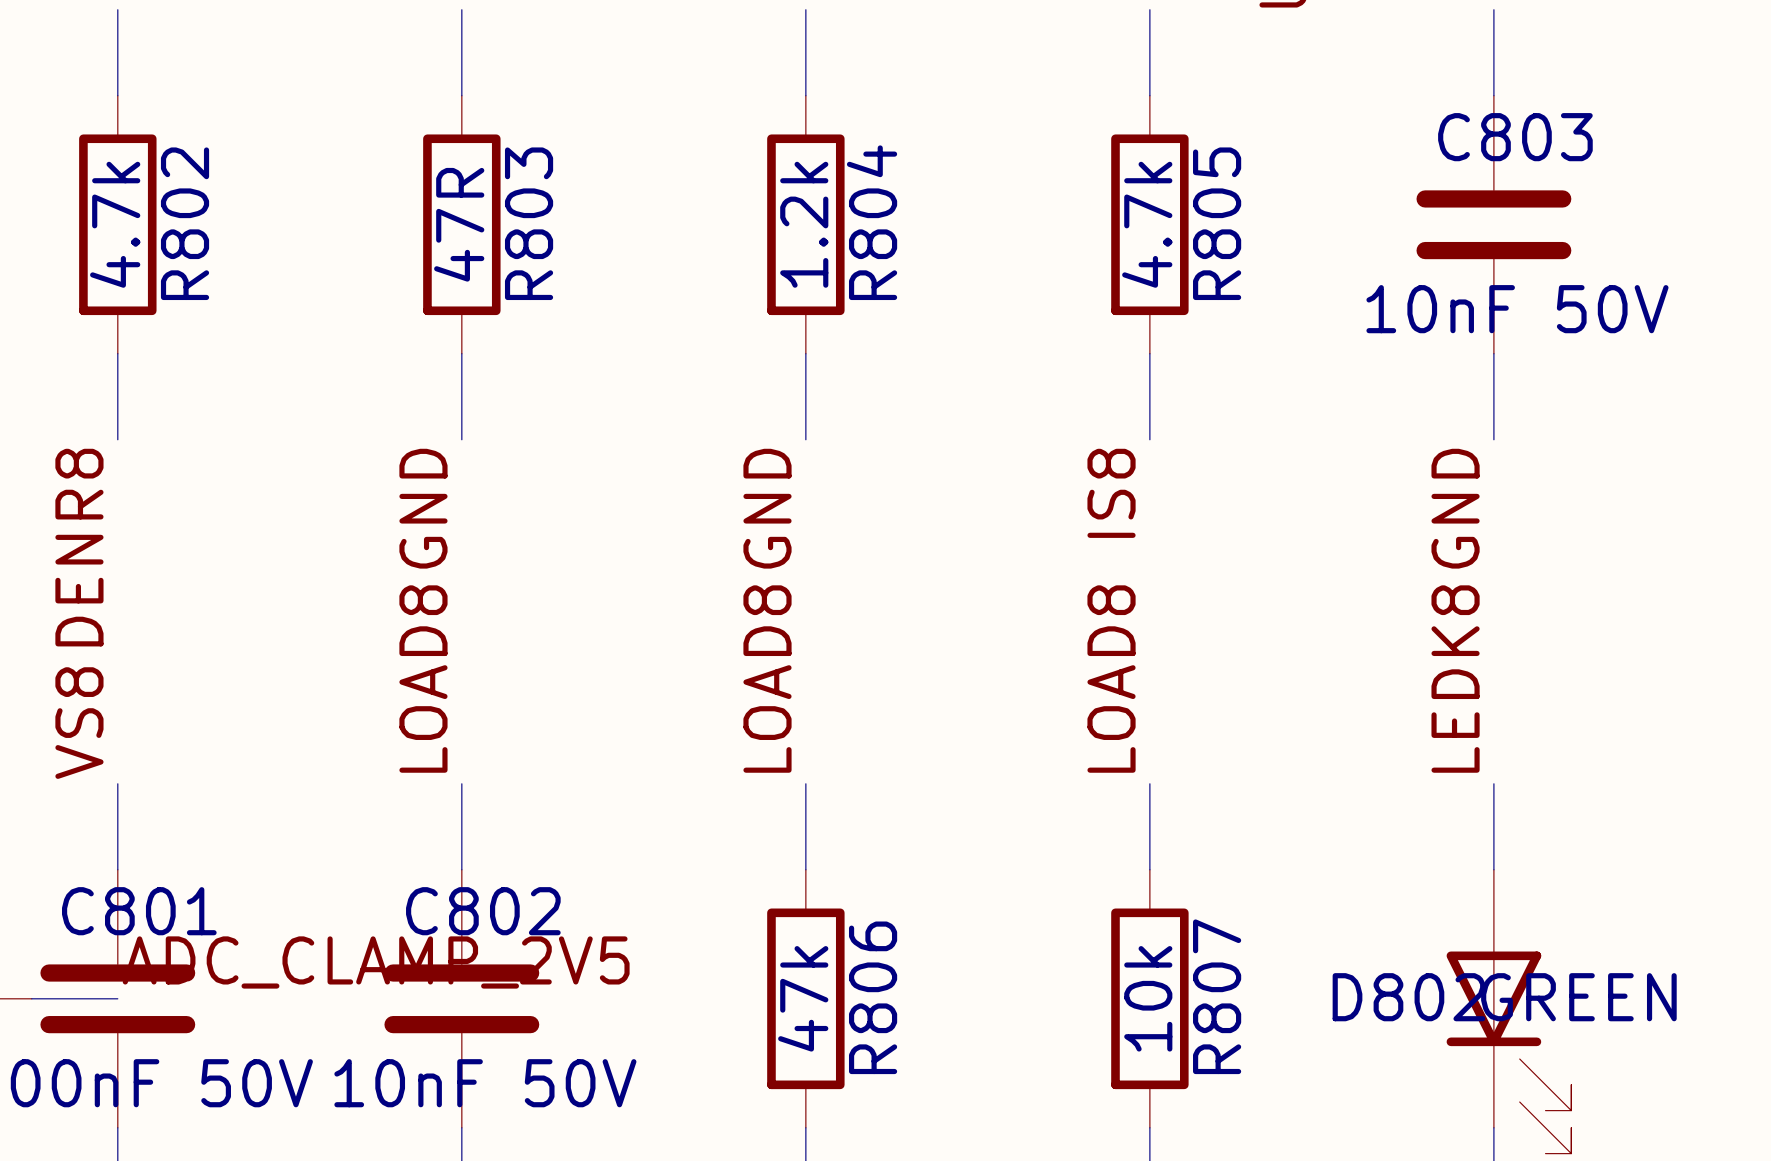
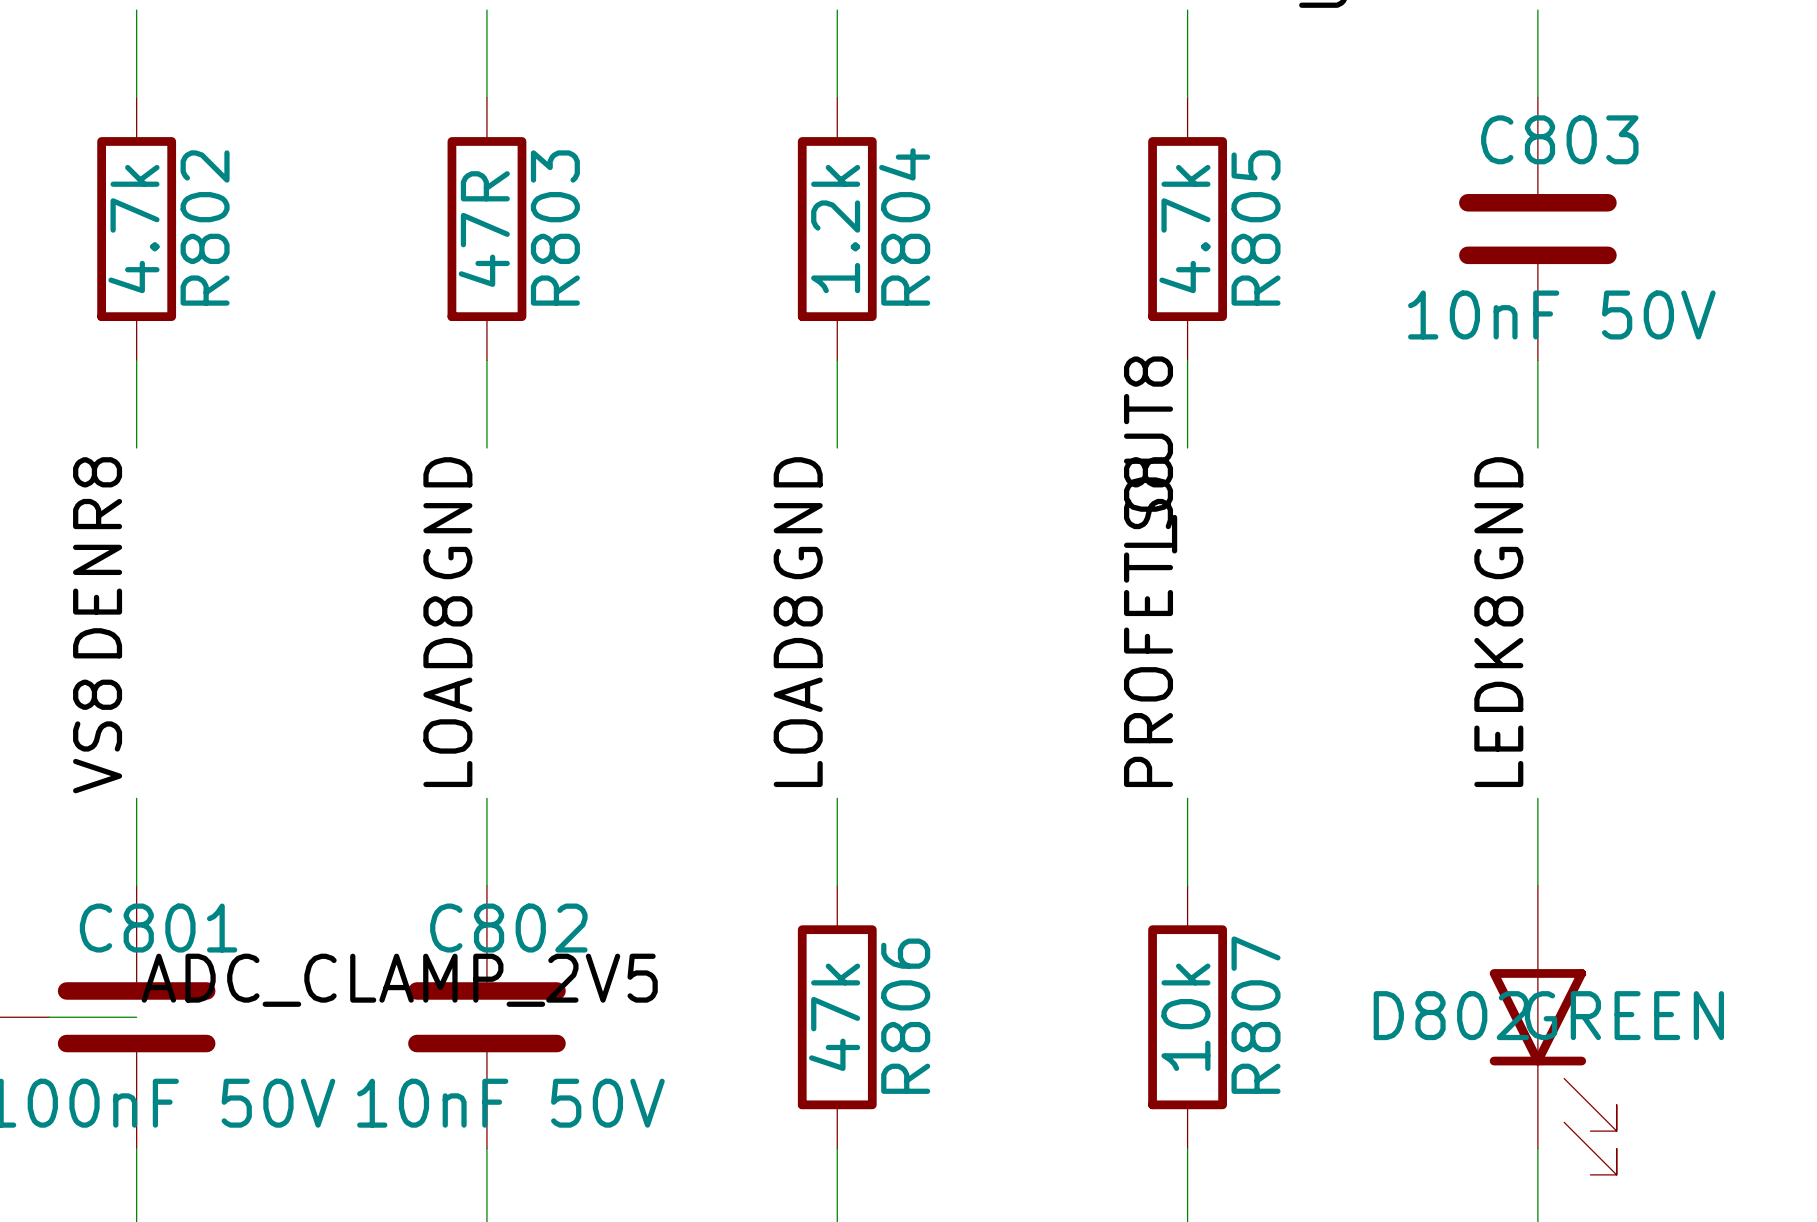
label: LOAD8 (1111, 679) -> PROFET_OUT8 (1150, 571)

